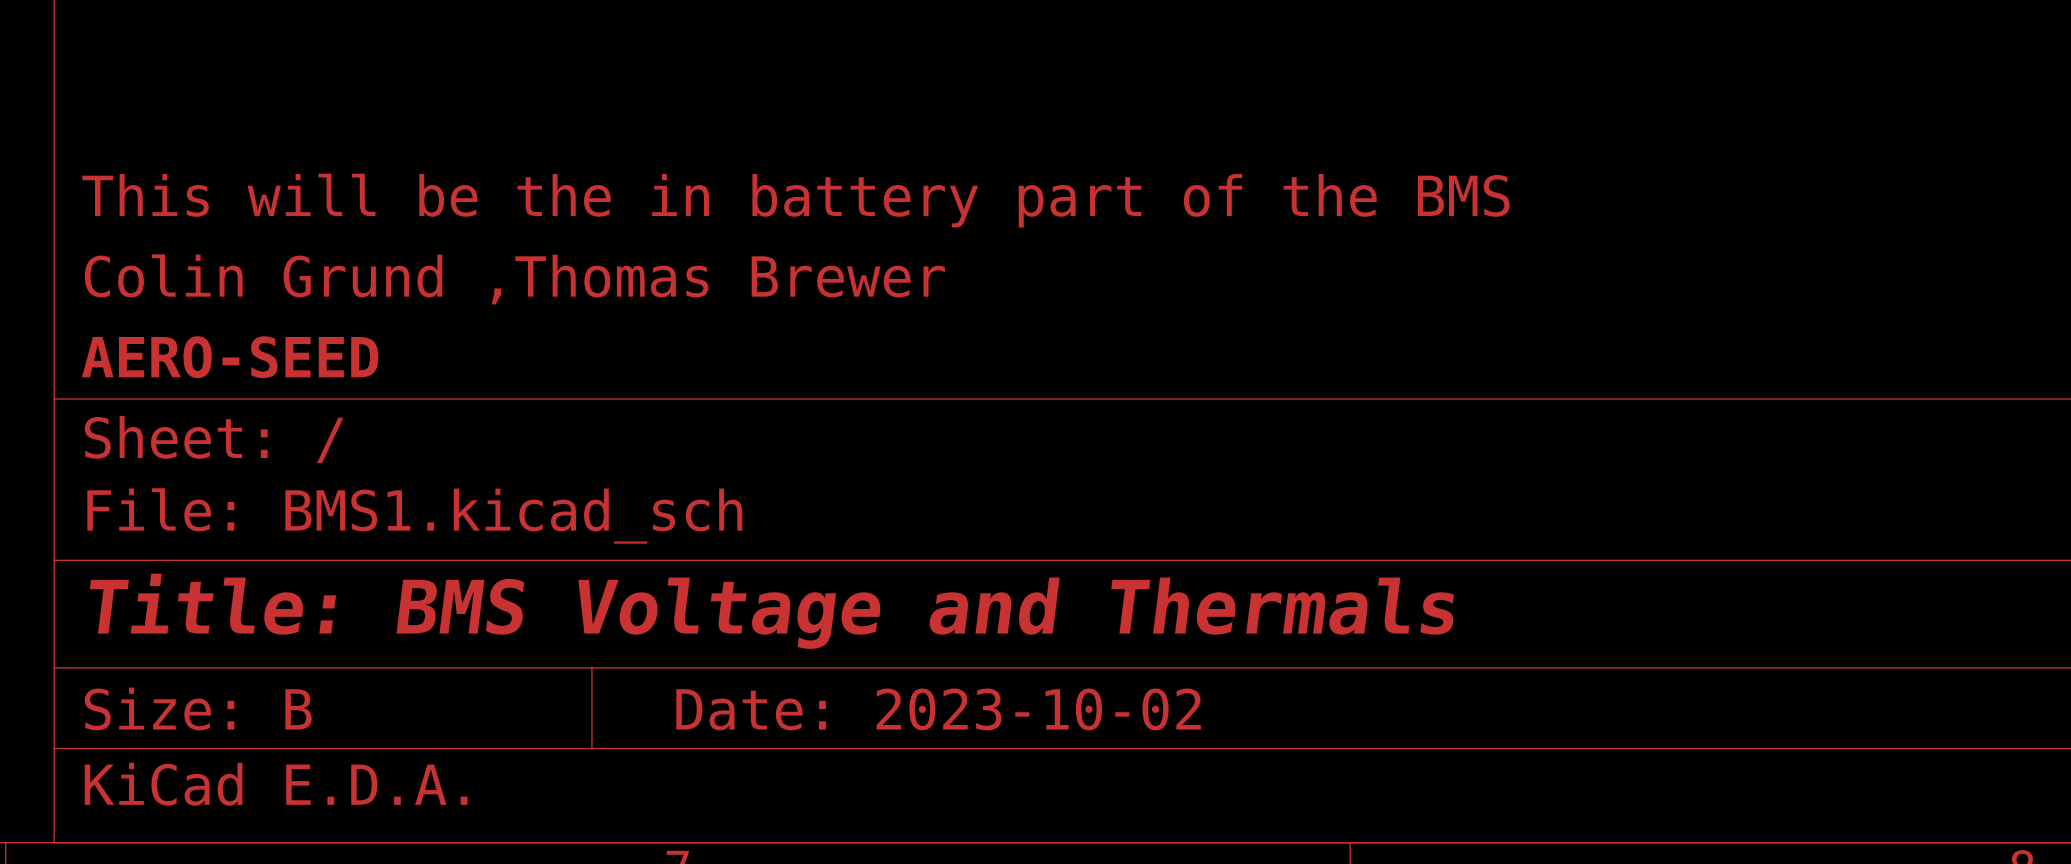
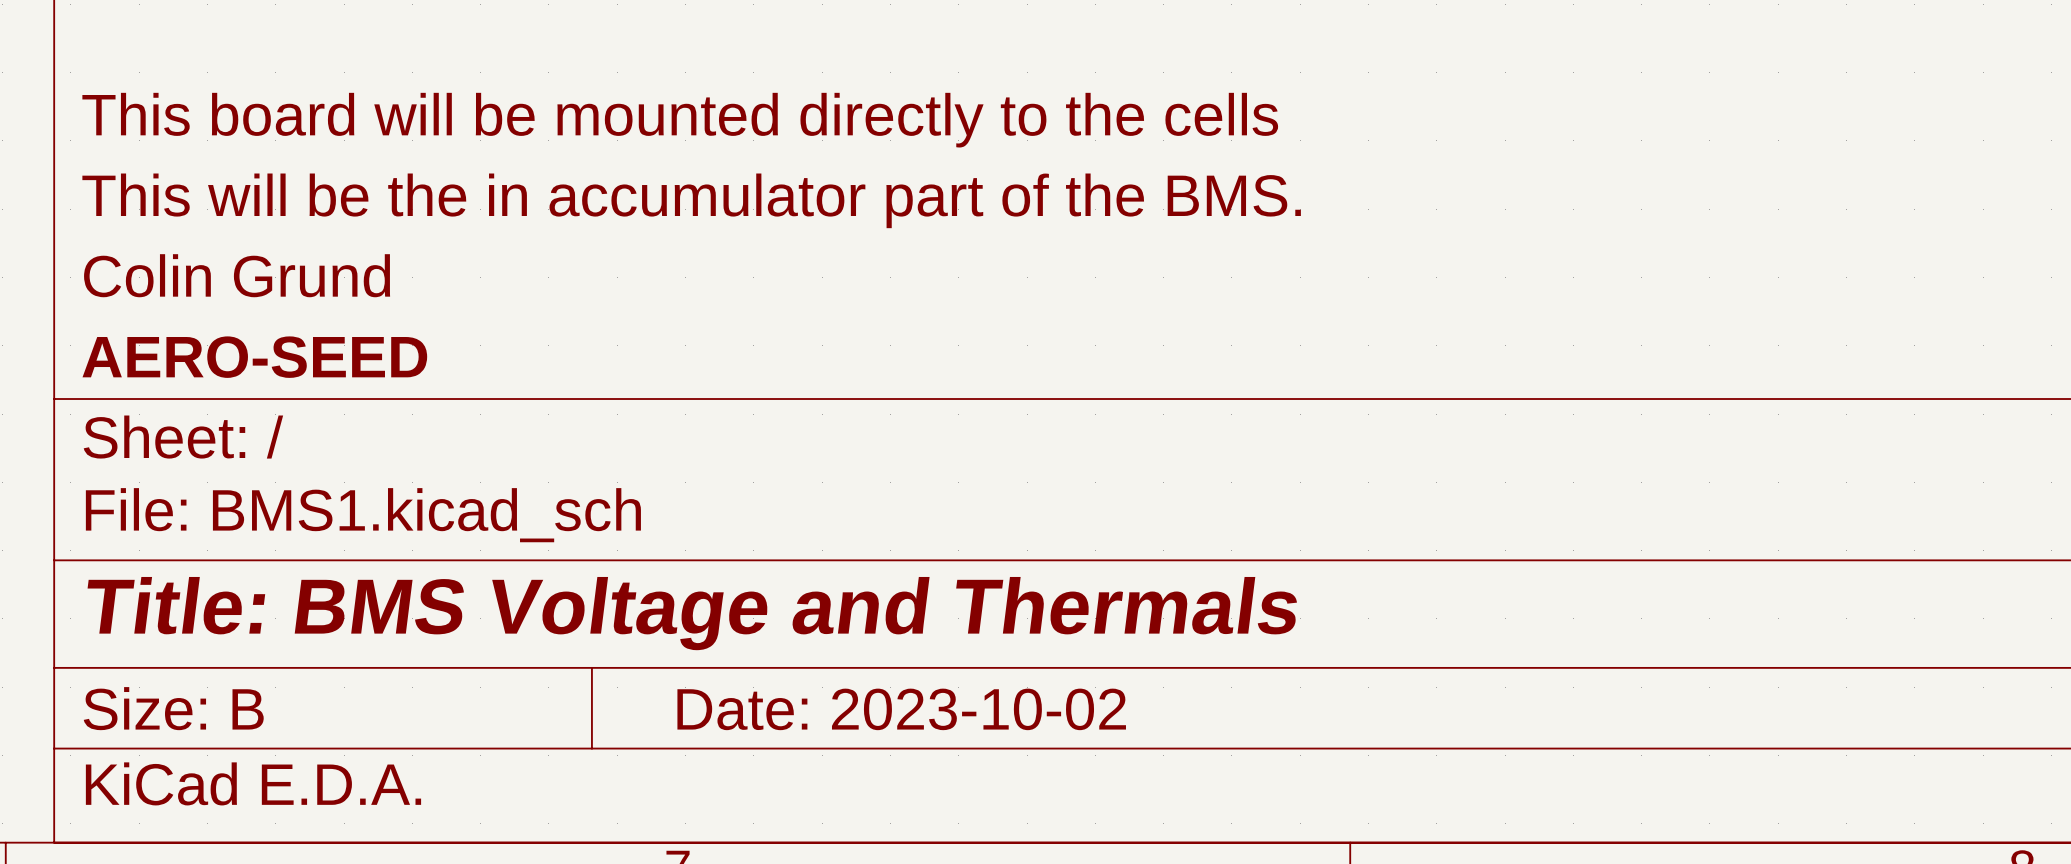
title block: none -> This board will be mounted directly to the cells (680, 120)
title block: This will be the in battery part of the BMS (795, 200) -> This will be the in accumulator part of the BMS. (691, 200)
title block: Colin Grund ,Thomas Brewer (514, 279) -> Colin Grund (237, 275)

